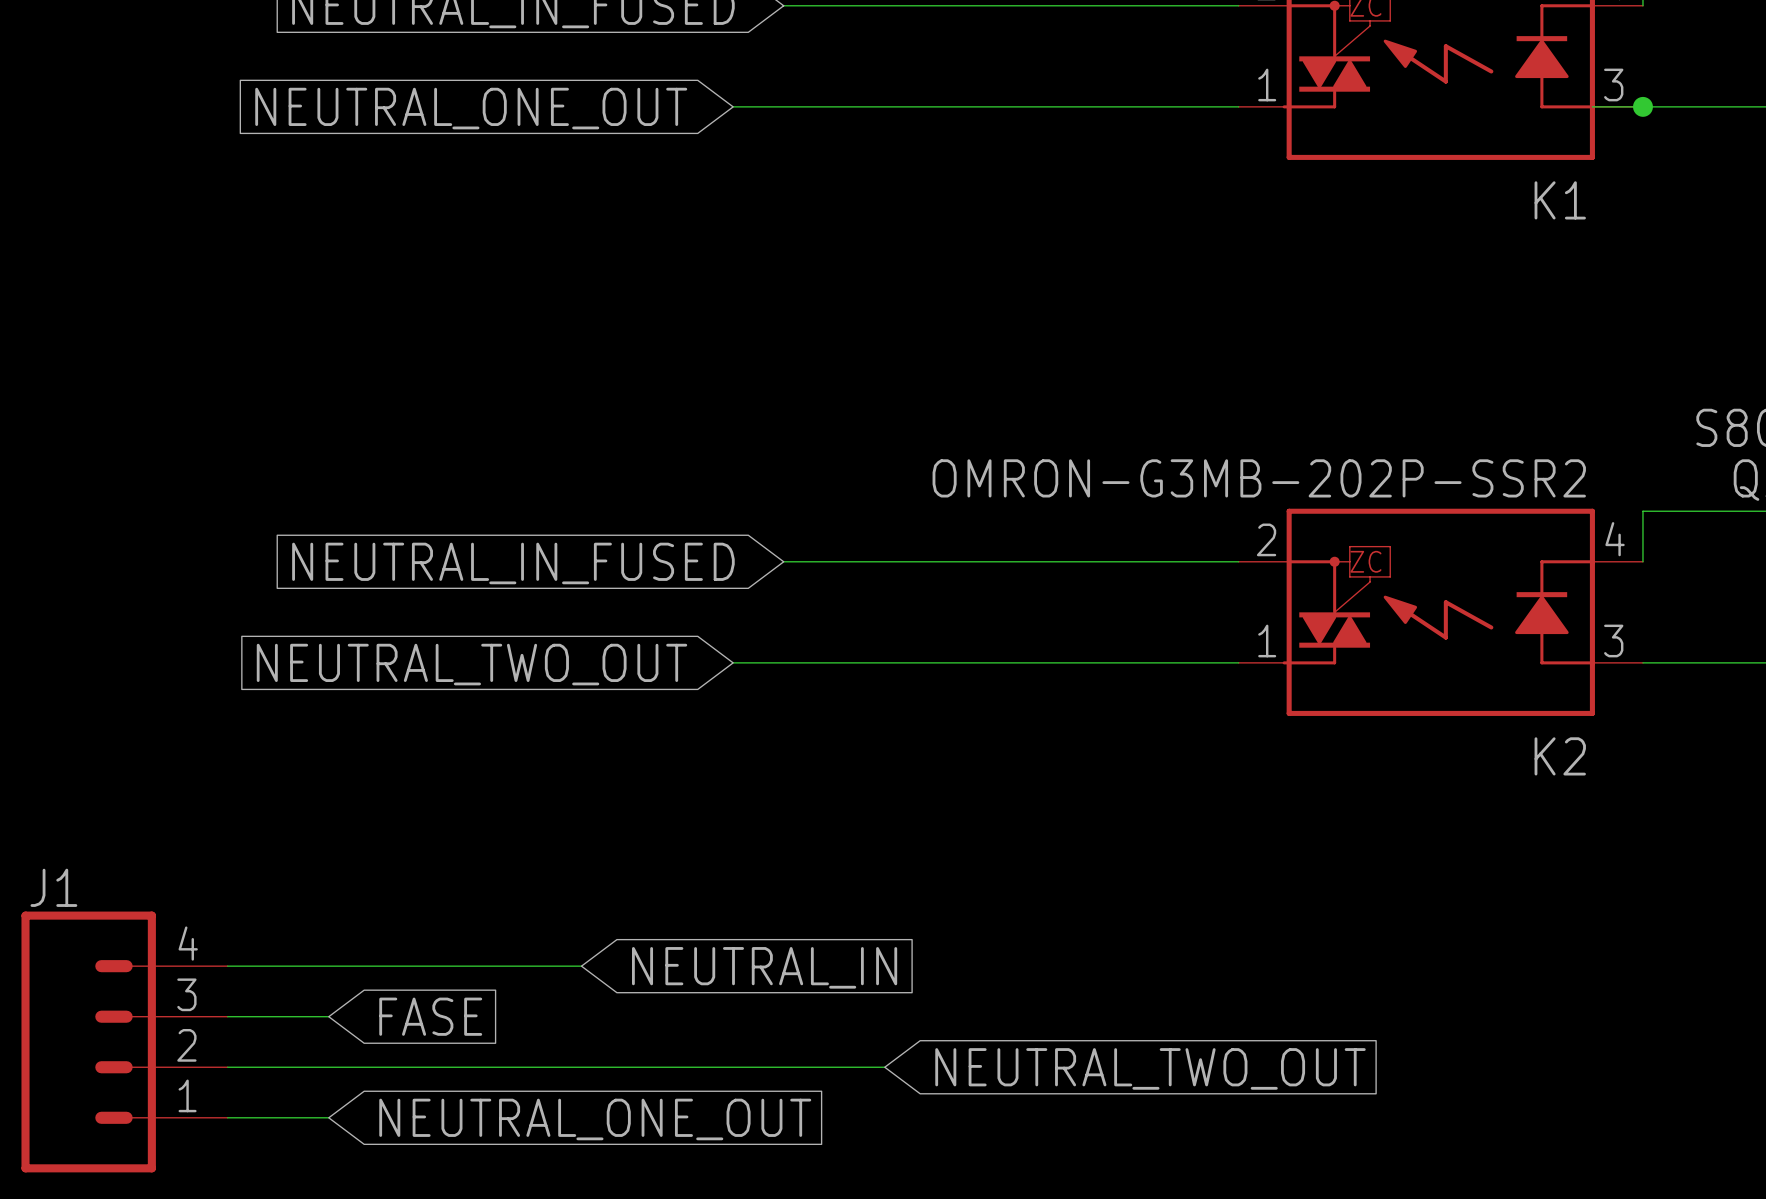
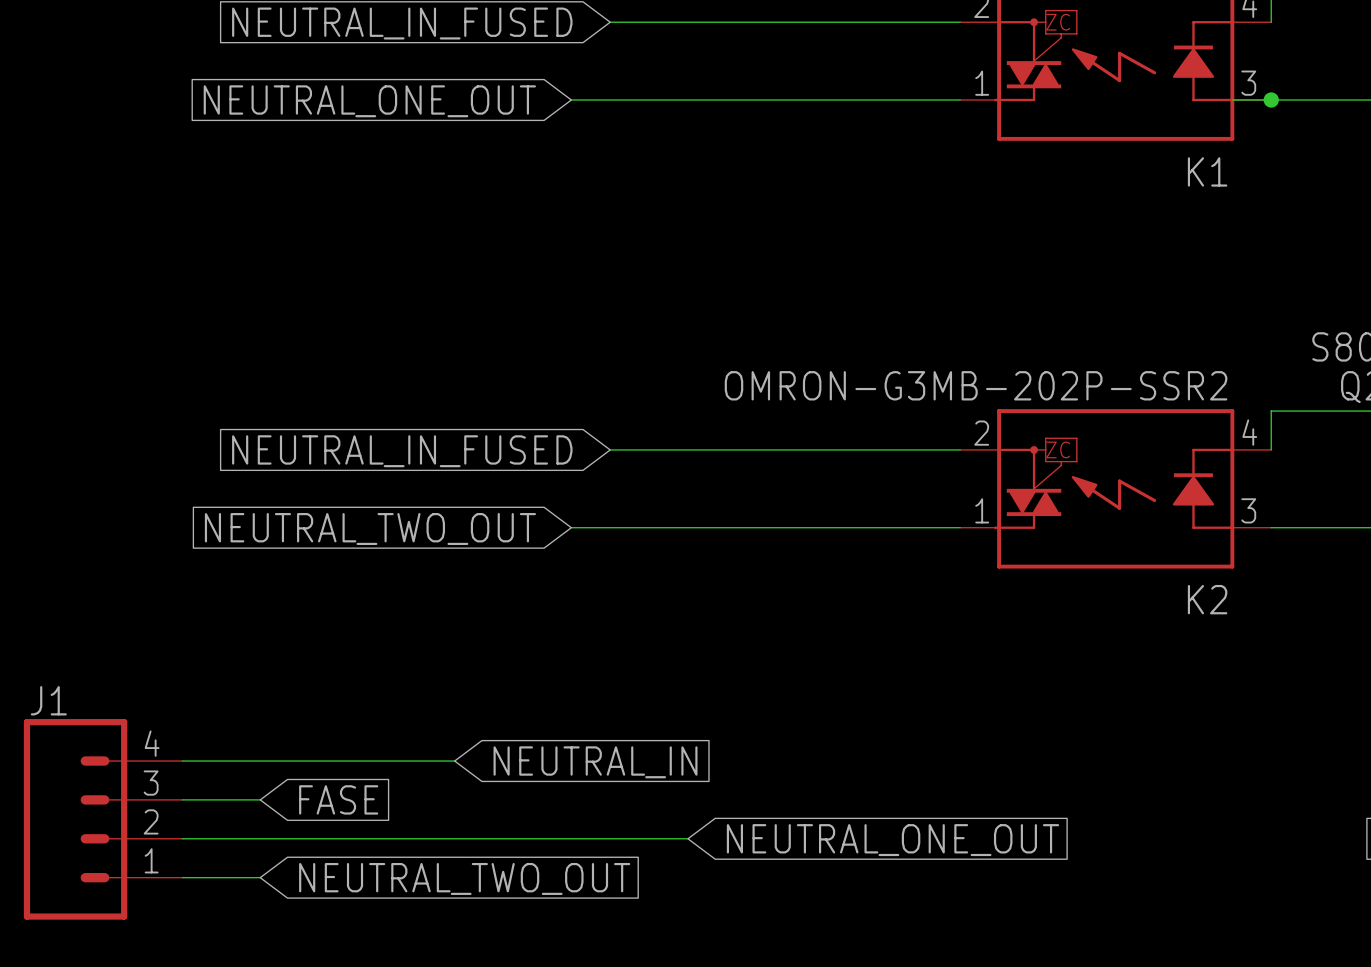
global label: NEUTRAL_TWO_OUT (1150, 1068) -> NEUTRAL_ONE_OUT (892, 840)
global label: NEUTRAL_ONE_OUT (595, 1119) -> NEUTRAL_TWO_OUT (464, 878)

